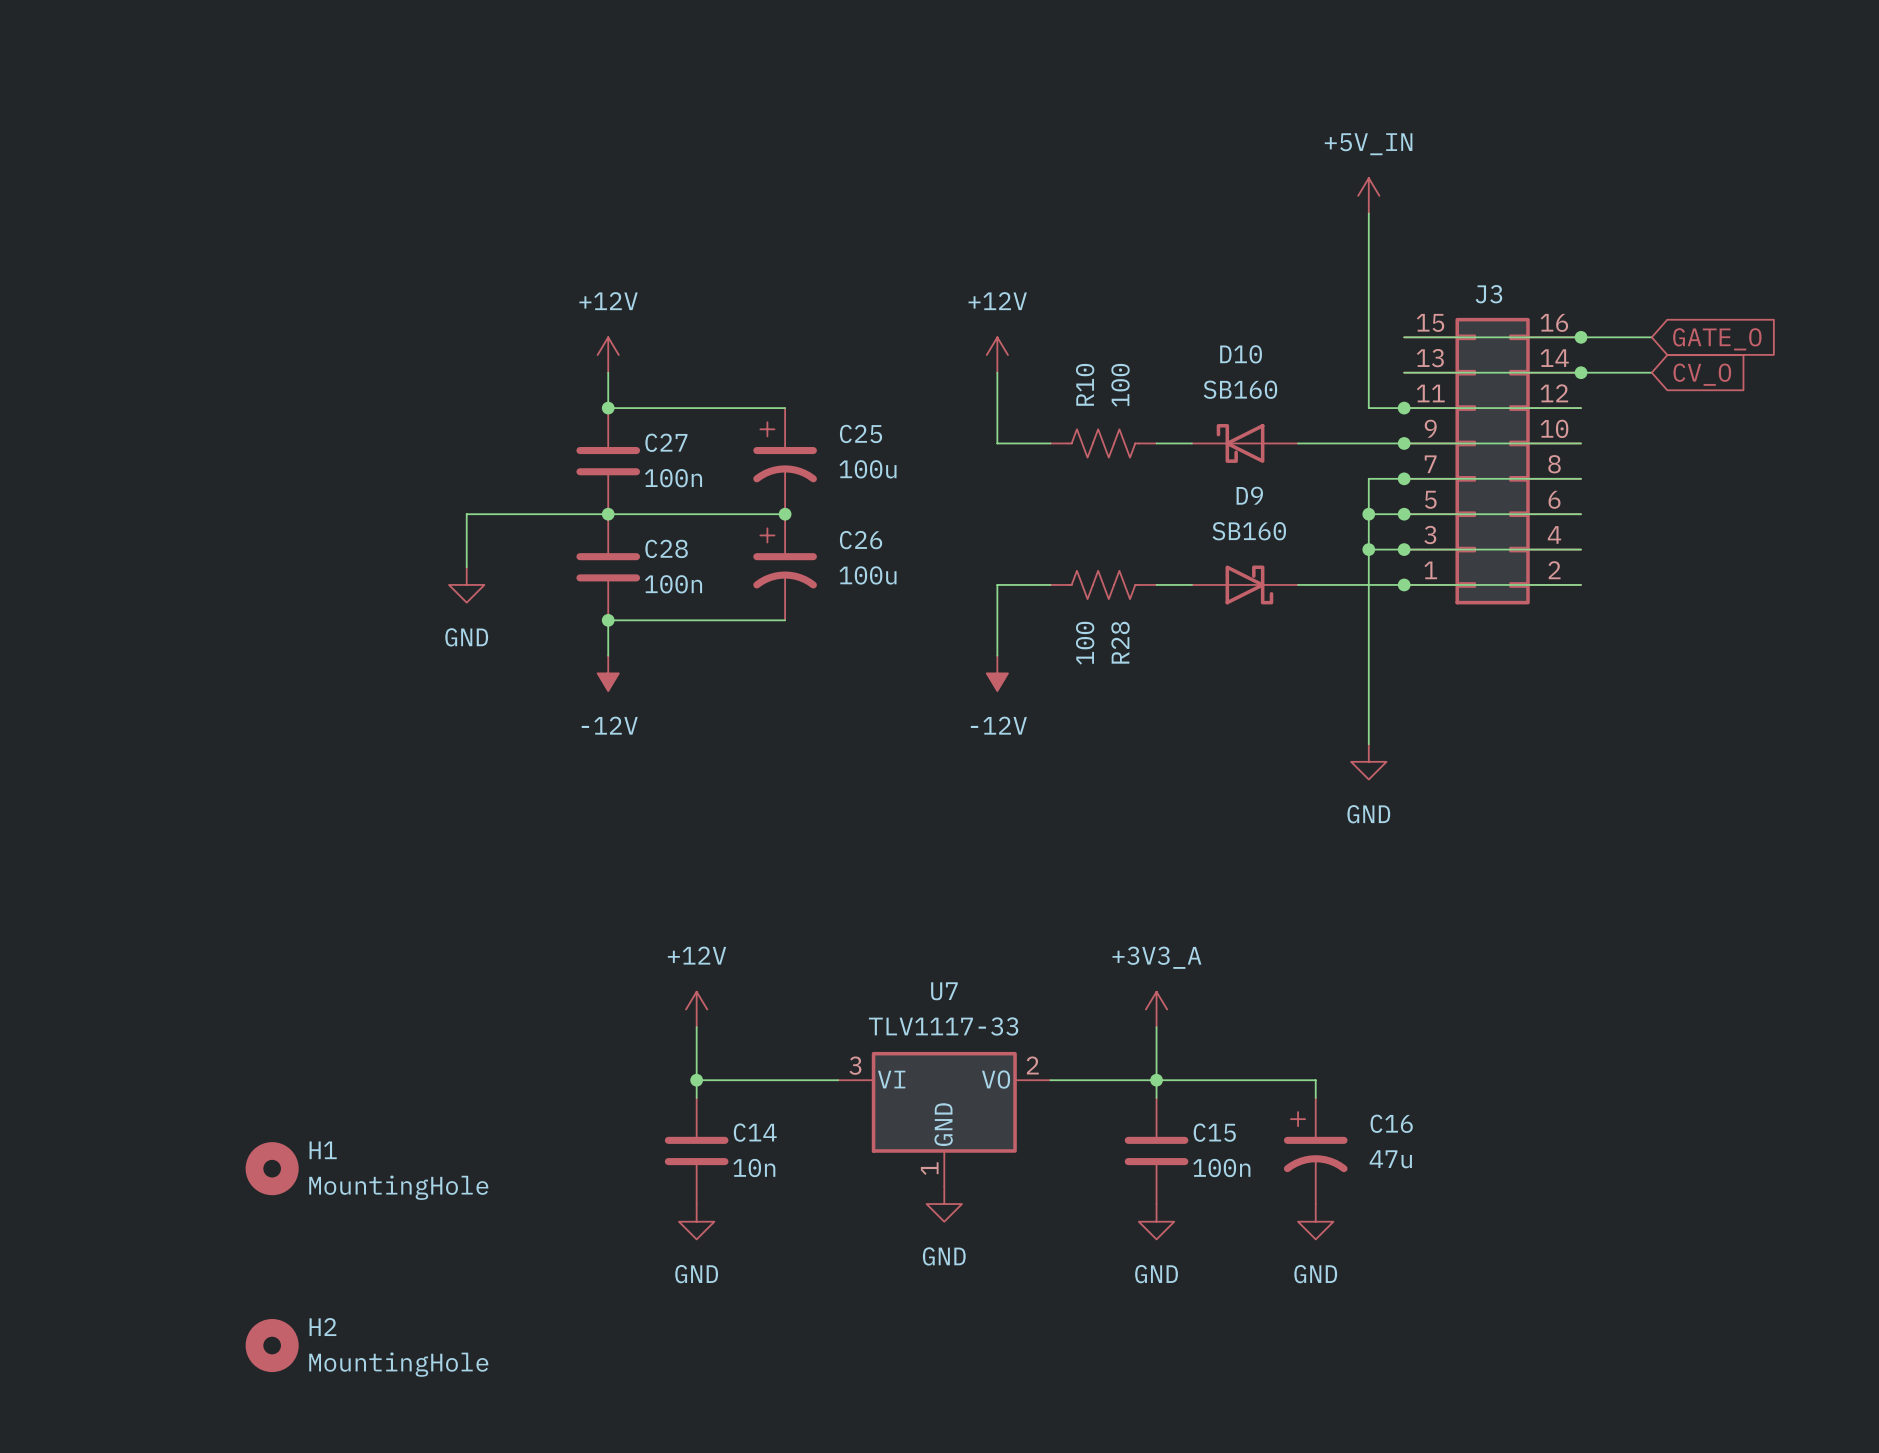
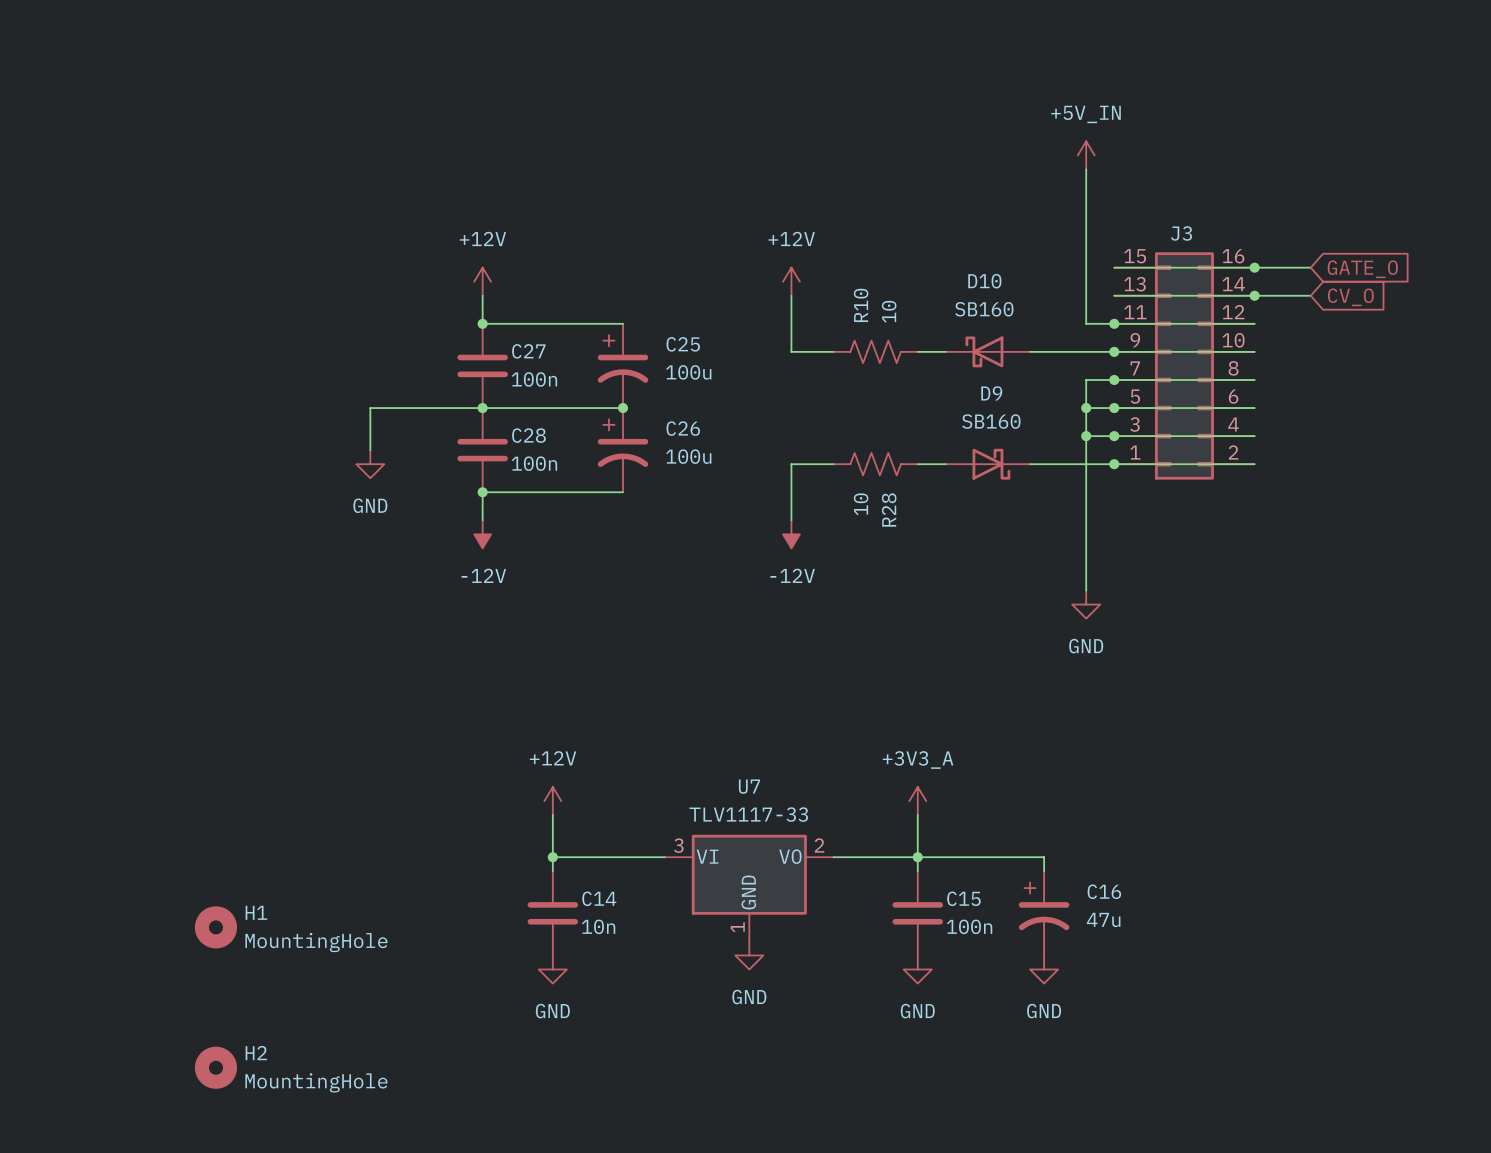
R10 value: 100 (1120, 385) -> 10 (889, 311)
R28 value: 100 (1085, 643) -> 10 (861, 504)

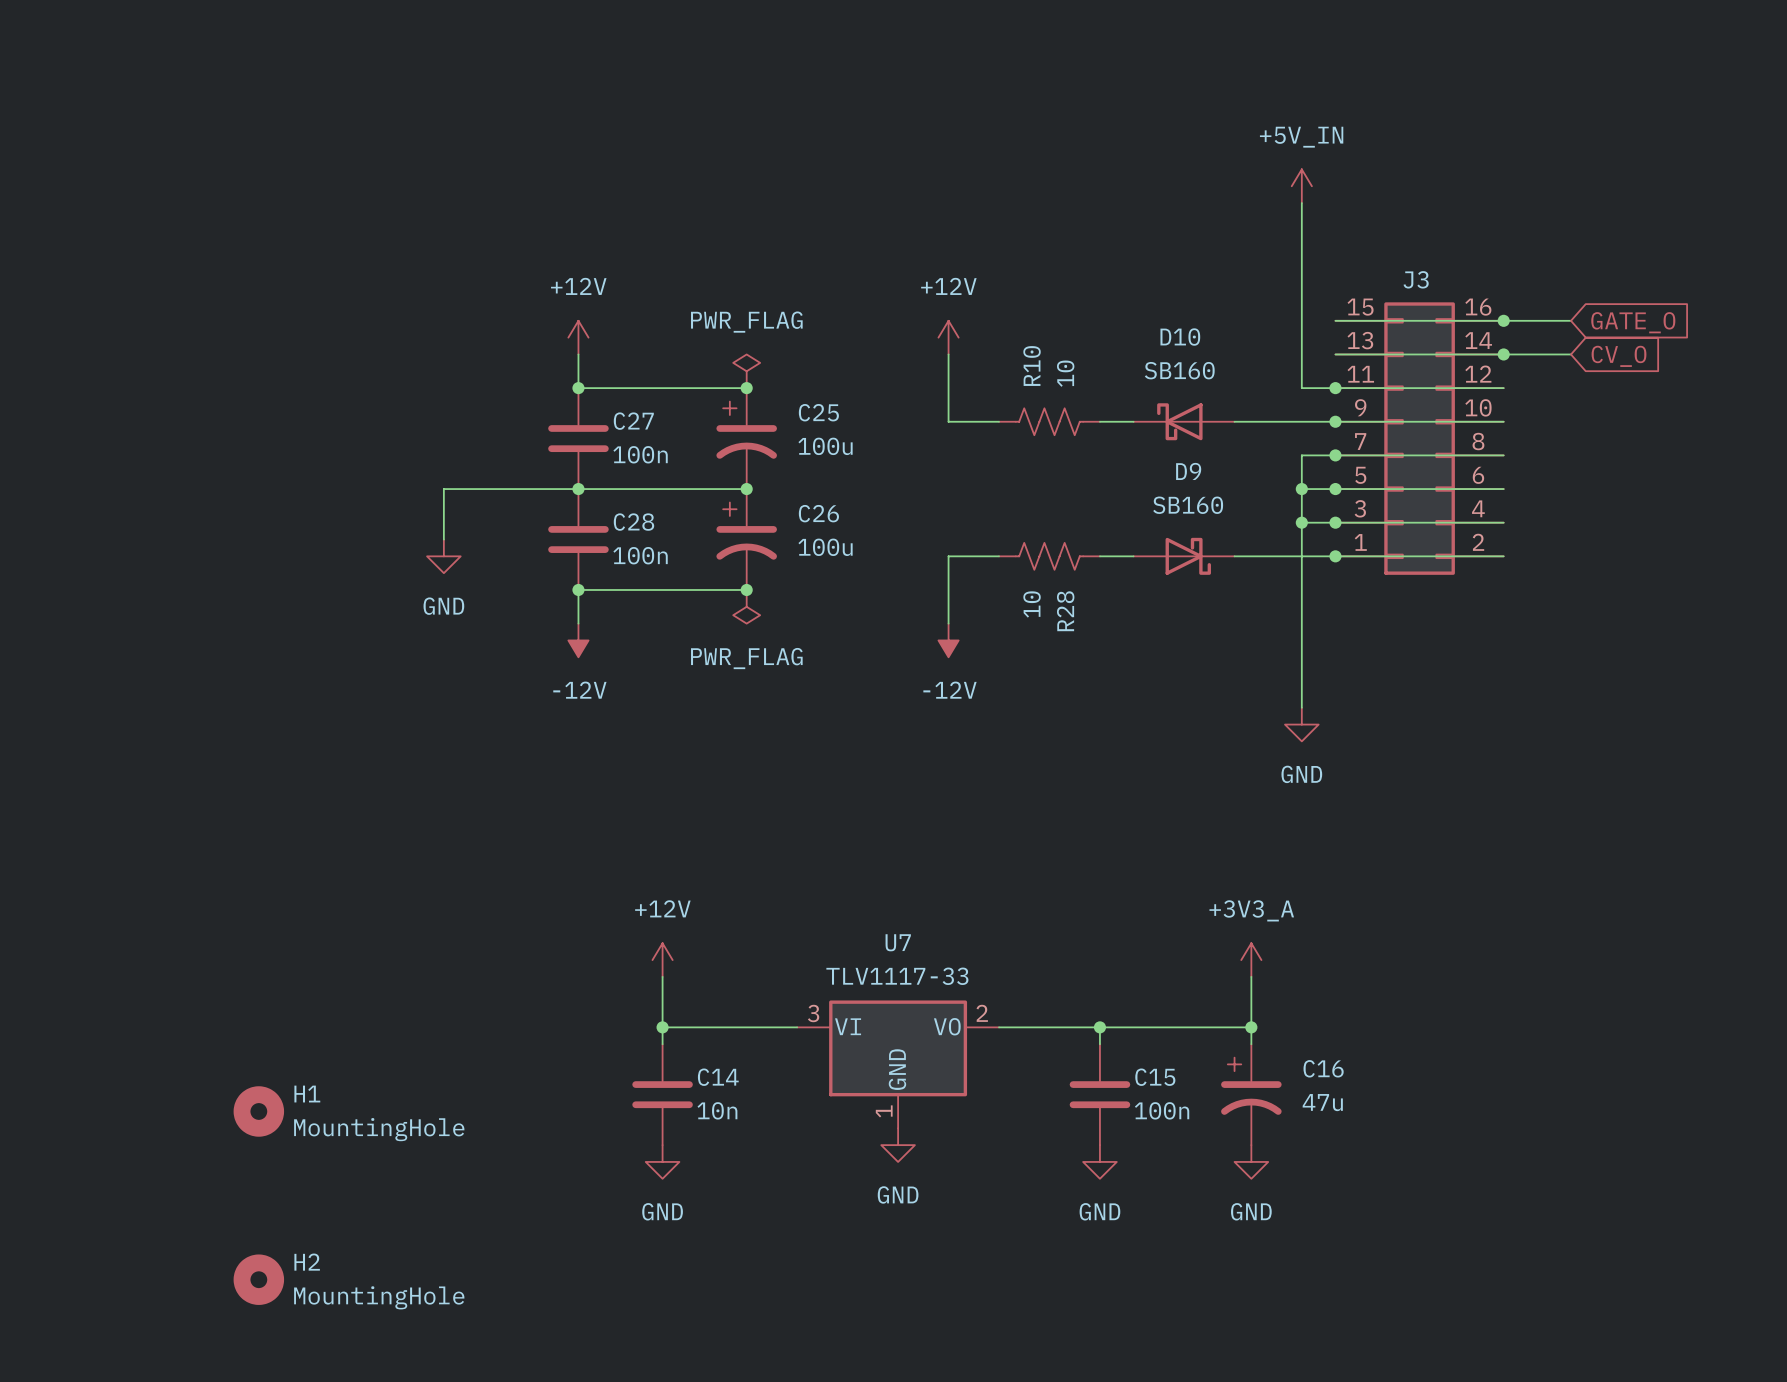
power symbol: none -> PWR_FLAG (746, 371)
junction: none -> (746, 388)
junction: none -> (746, 589)
power symbol: none -> PWR_FLAG (746, 606)
power symbol position: +3V3_A (917, 801) -> +3V3_A (1251, 960)
wire: (917, 815) (917, 857) -> (1251, 976) (1251, 1027)
junction: none -> (1251, 1027)

